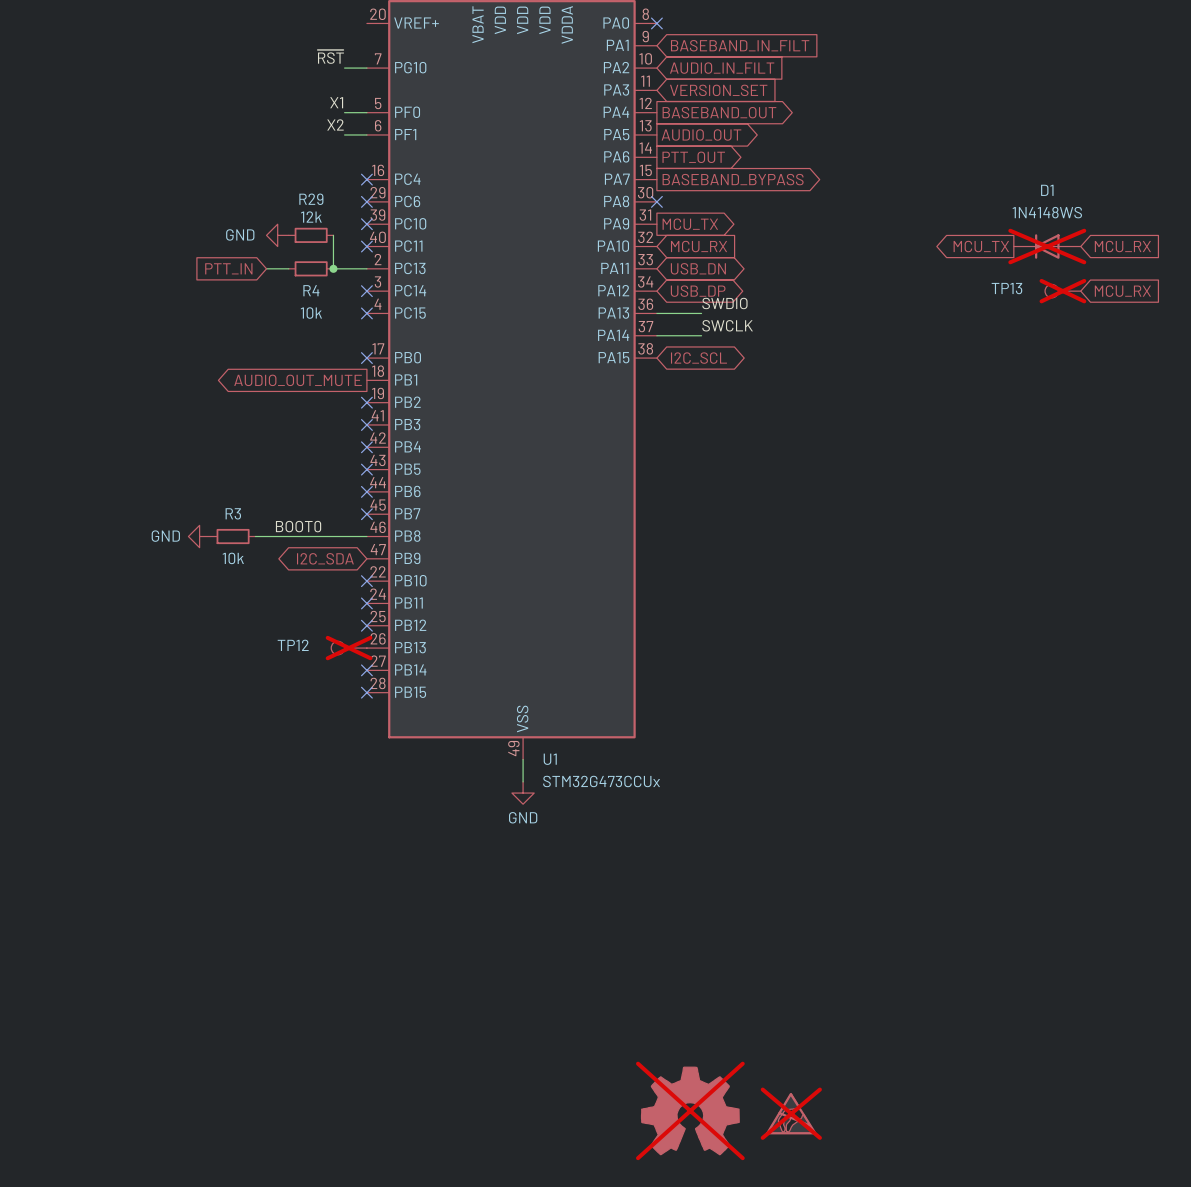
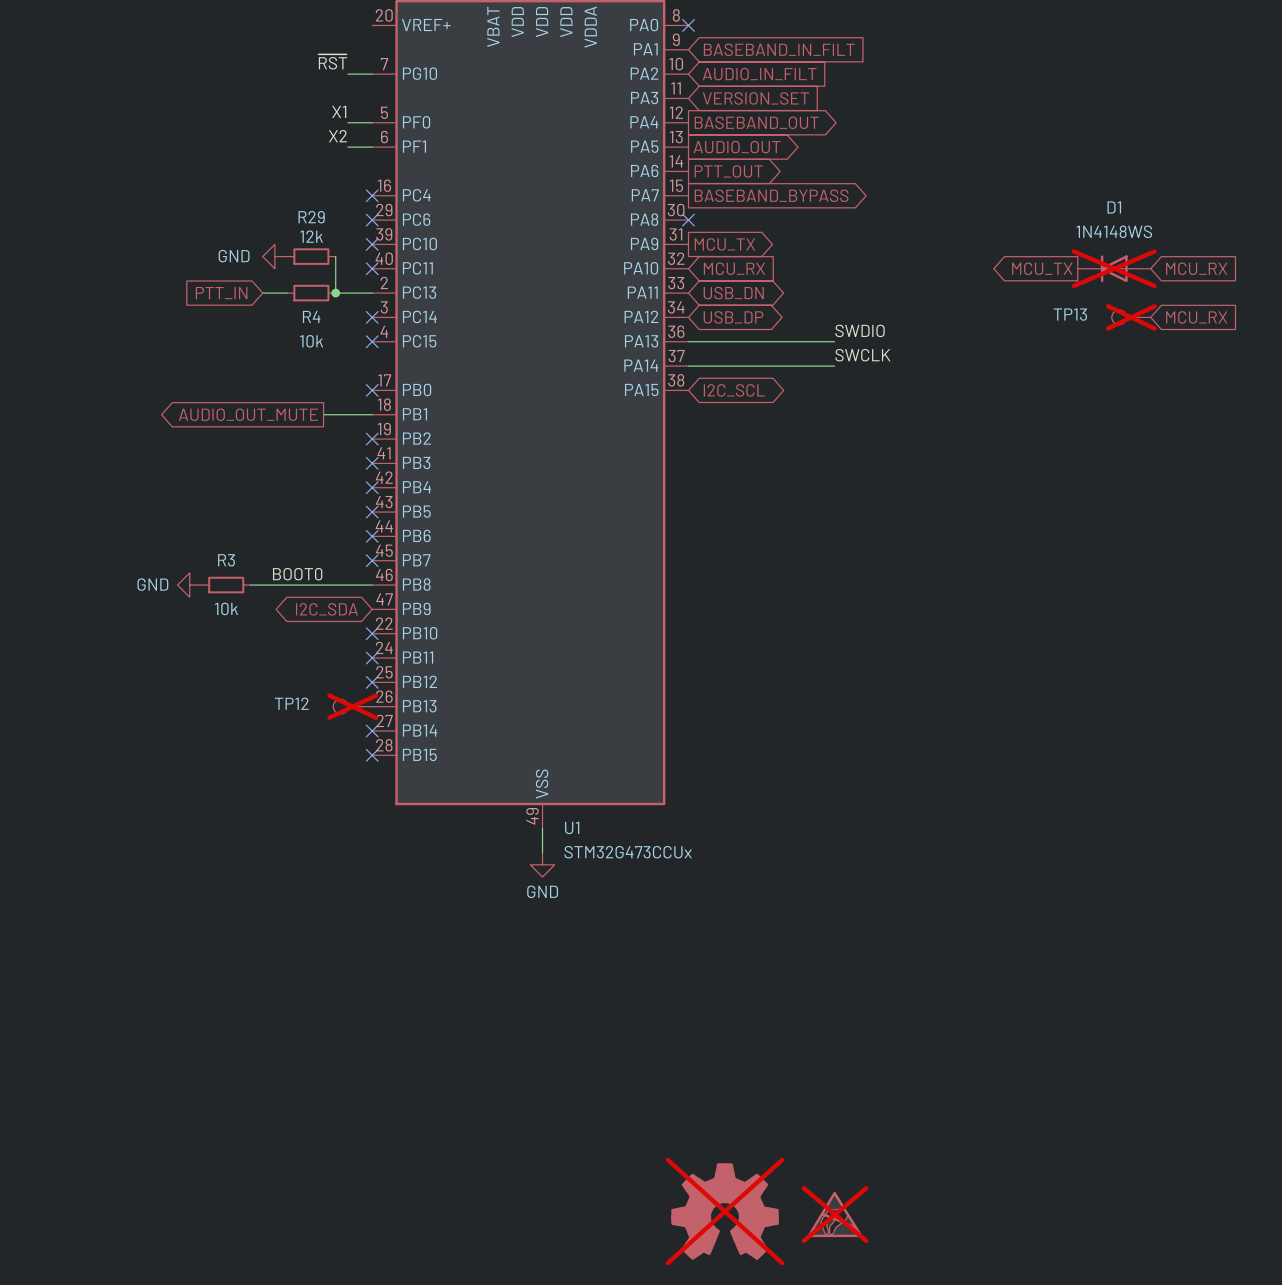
label position: SWDIO (724, 303) -> SWDIO (860, 330)
wire: none -> (737, 341) (834, 341)
label position: SWCLK (727, 325) -> SWCLK (862, 355)
wire: none -> (737, 366) (834, 366)
global label position: AUDIO_OUT_MUTE (298, 380) -> AUDIO_OUT_MUTE (248, 414)
wire: none -> (323, 414) (372, 414)

